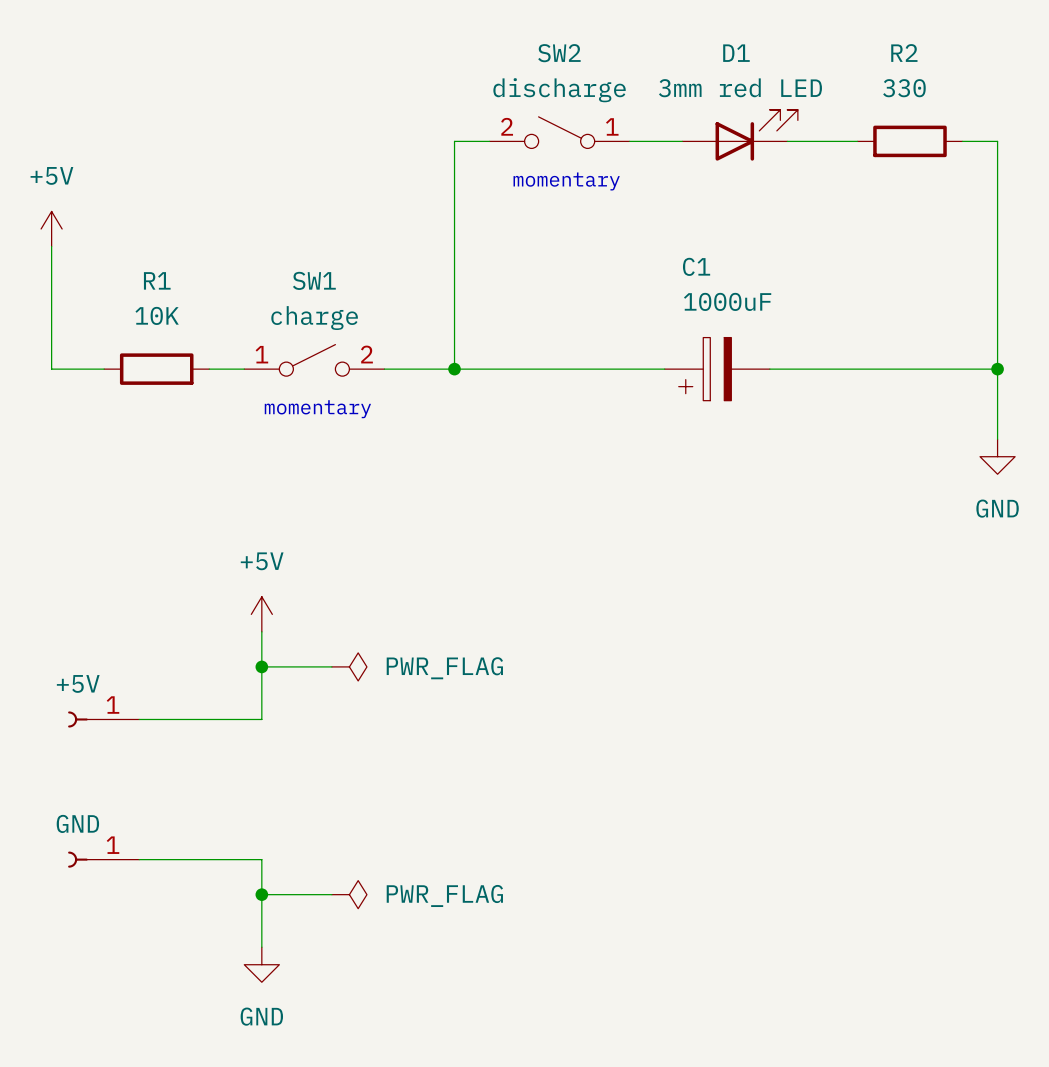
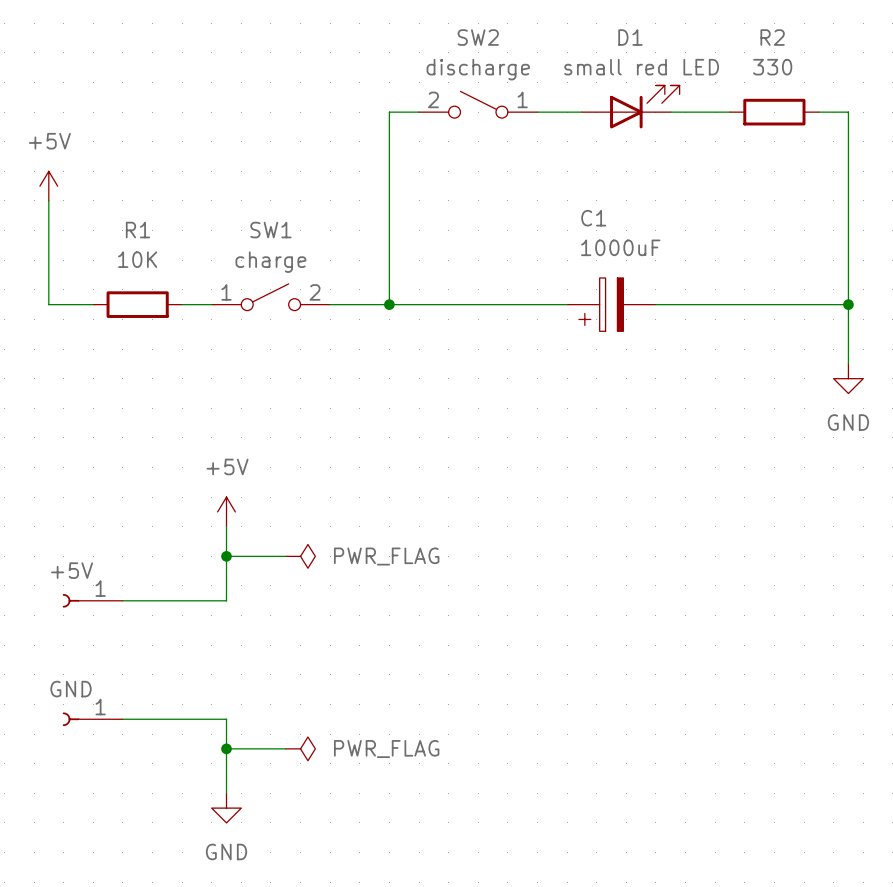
D1 value: 3mm red LED (740, 87) -> small red LED (641, 67)
text: momentary (566, 181) -> none
text: momentary (317, 409) -> none

